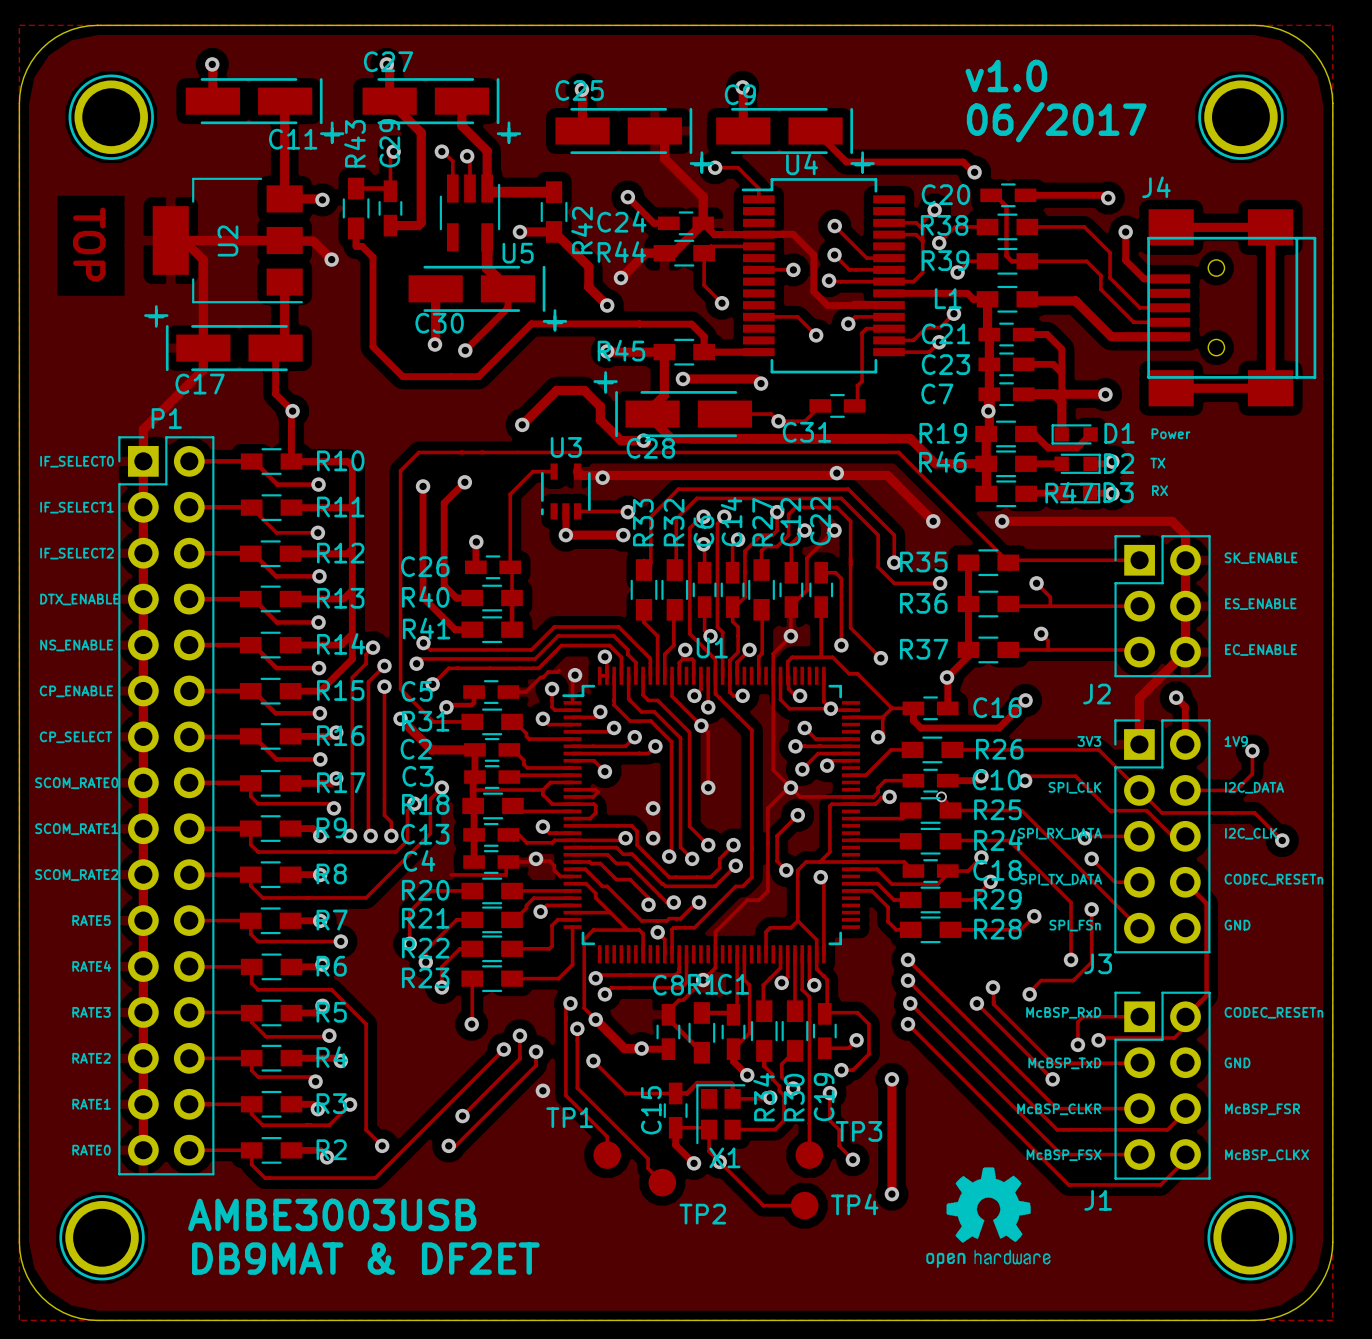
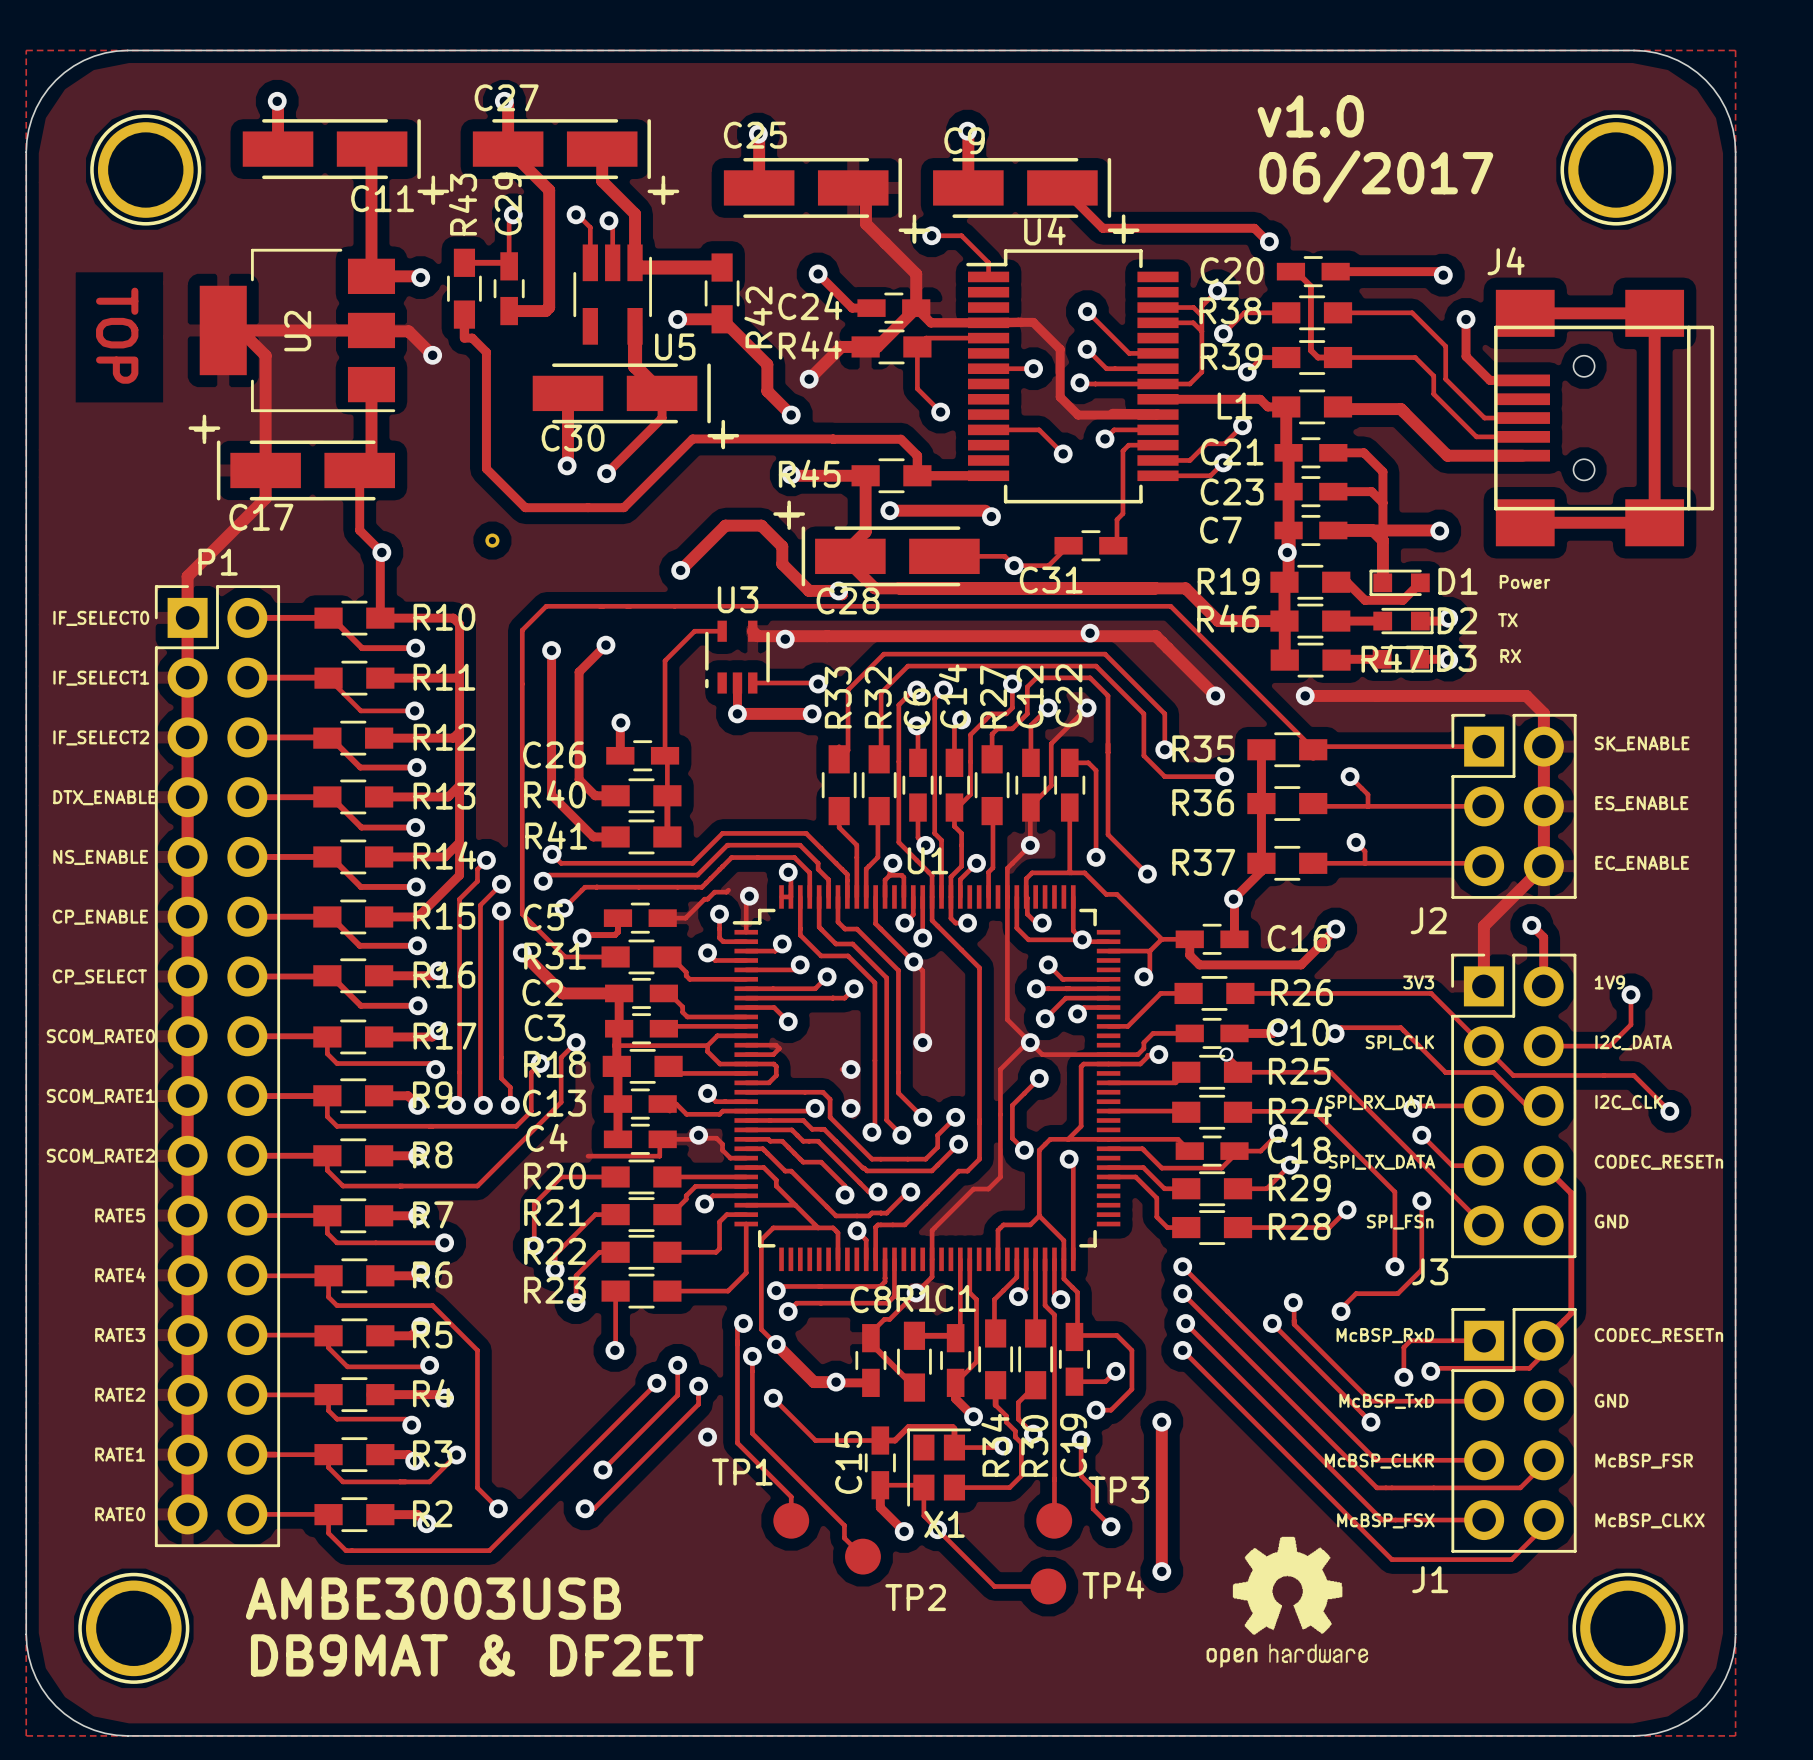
part: none -> (492, 540)

